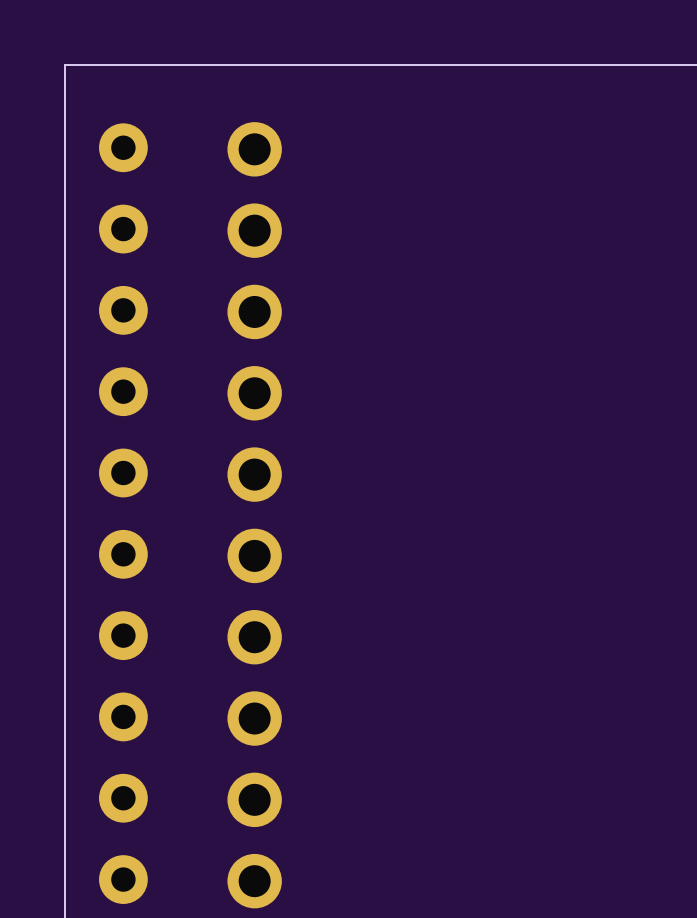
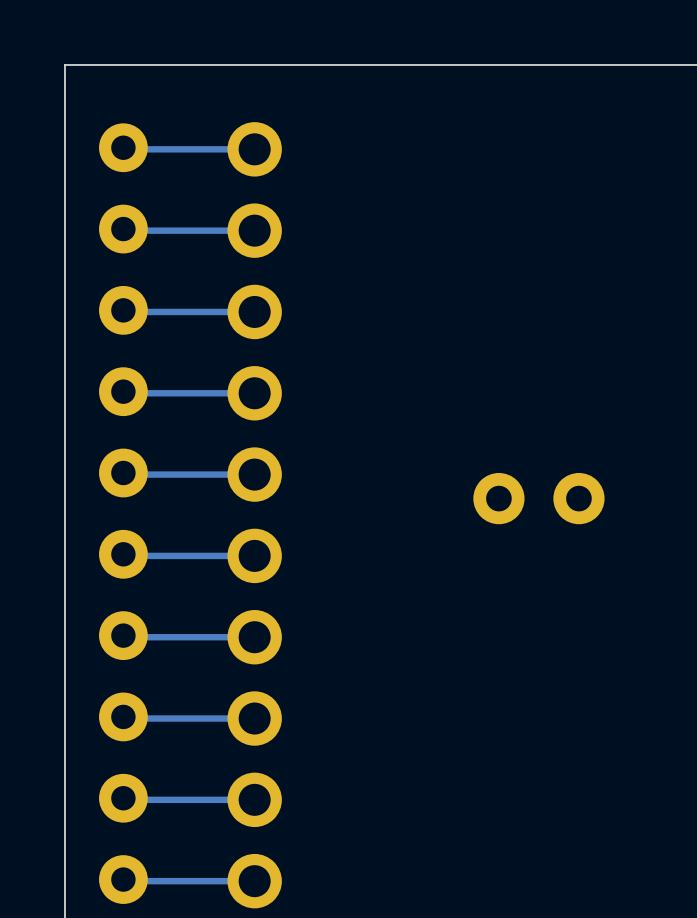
track: none -> (123, 147) (125, 149) (254, 149)
track: none -> (123, 229) (125, 230) (254, 230)
track: none -> (123, 310) (125, 311) (254, 311)
track: none -> (123, 391) (125, 393) (254, 393)
track: none -> (123, 472) (125, 474) (254, 474)
part: none -> (538, 498)
track: none -> (123, 554) (125, 555) (254, 555)
track: none -> (123, 635) (125, 637) (254, 637)
track: none -> (123, 716) (125, 718) (254, 718)
track: none -> (123, 798) (125, 799) (254, 799)
track: none -> (123, 879) (125, 881) (254, 881)

